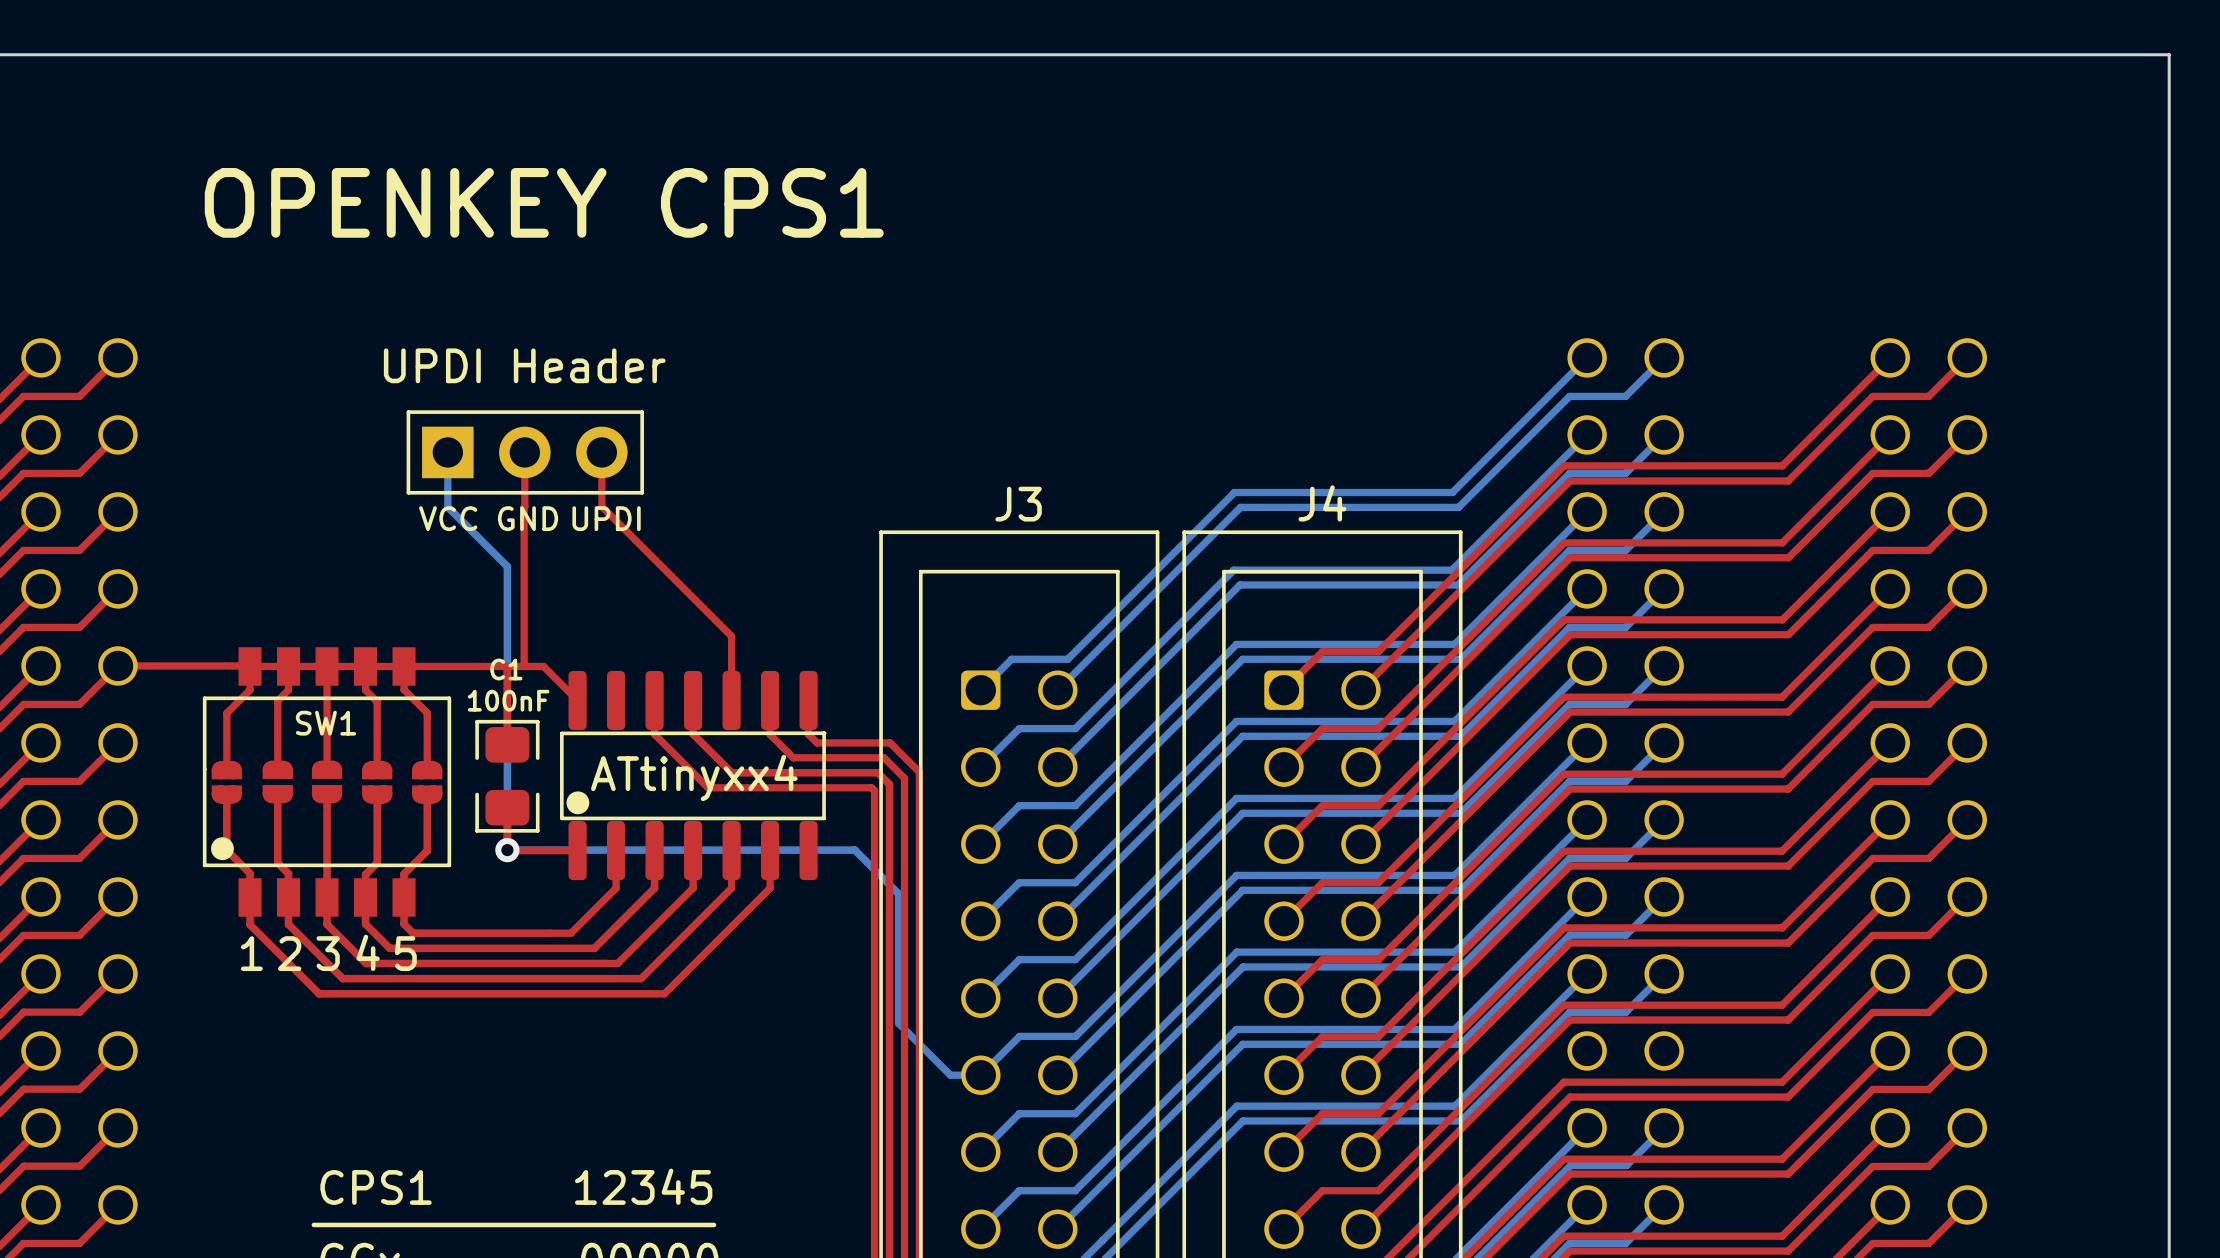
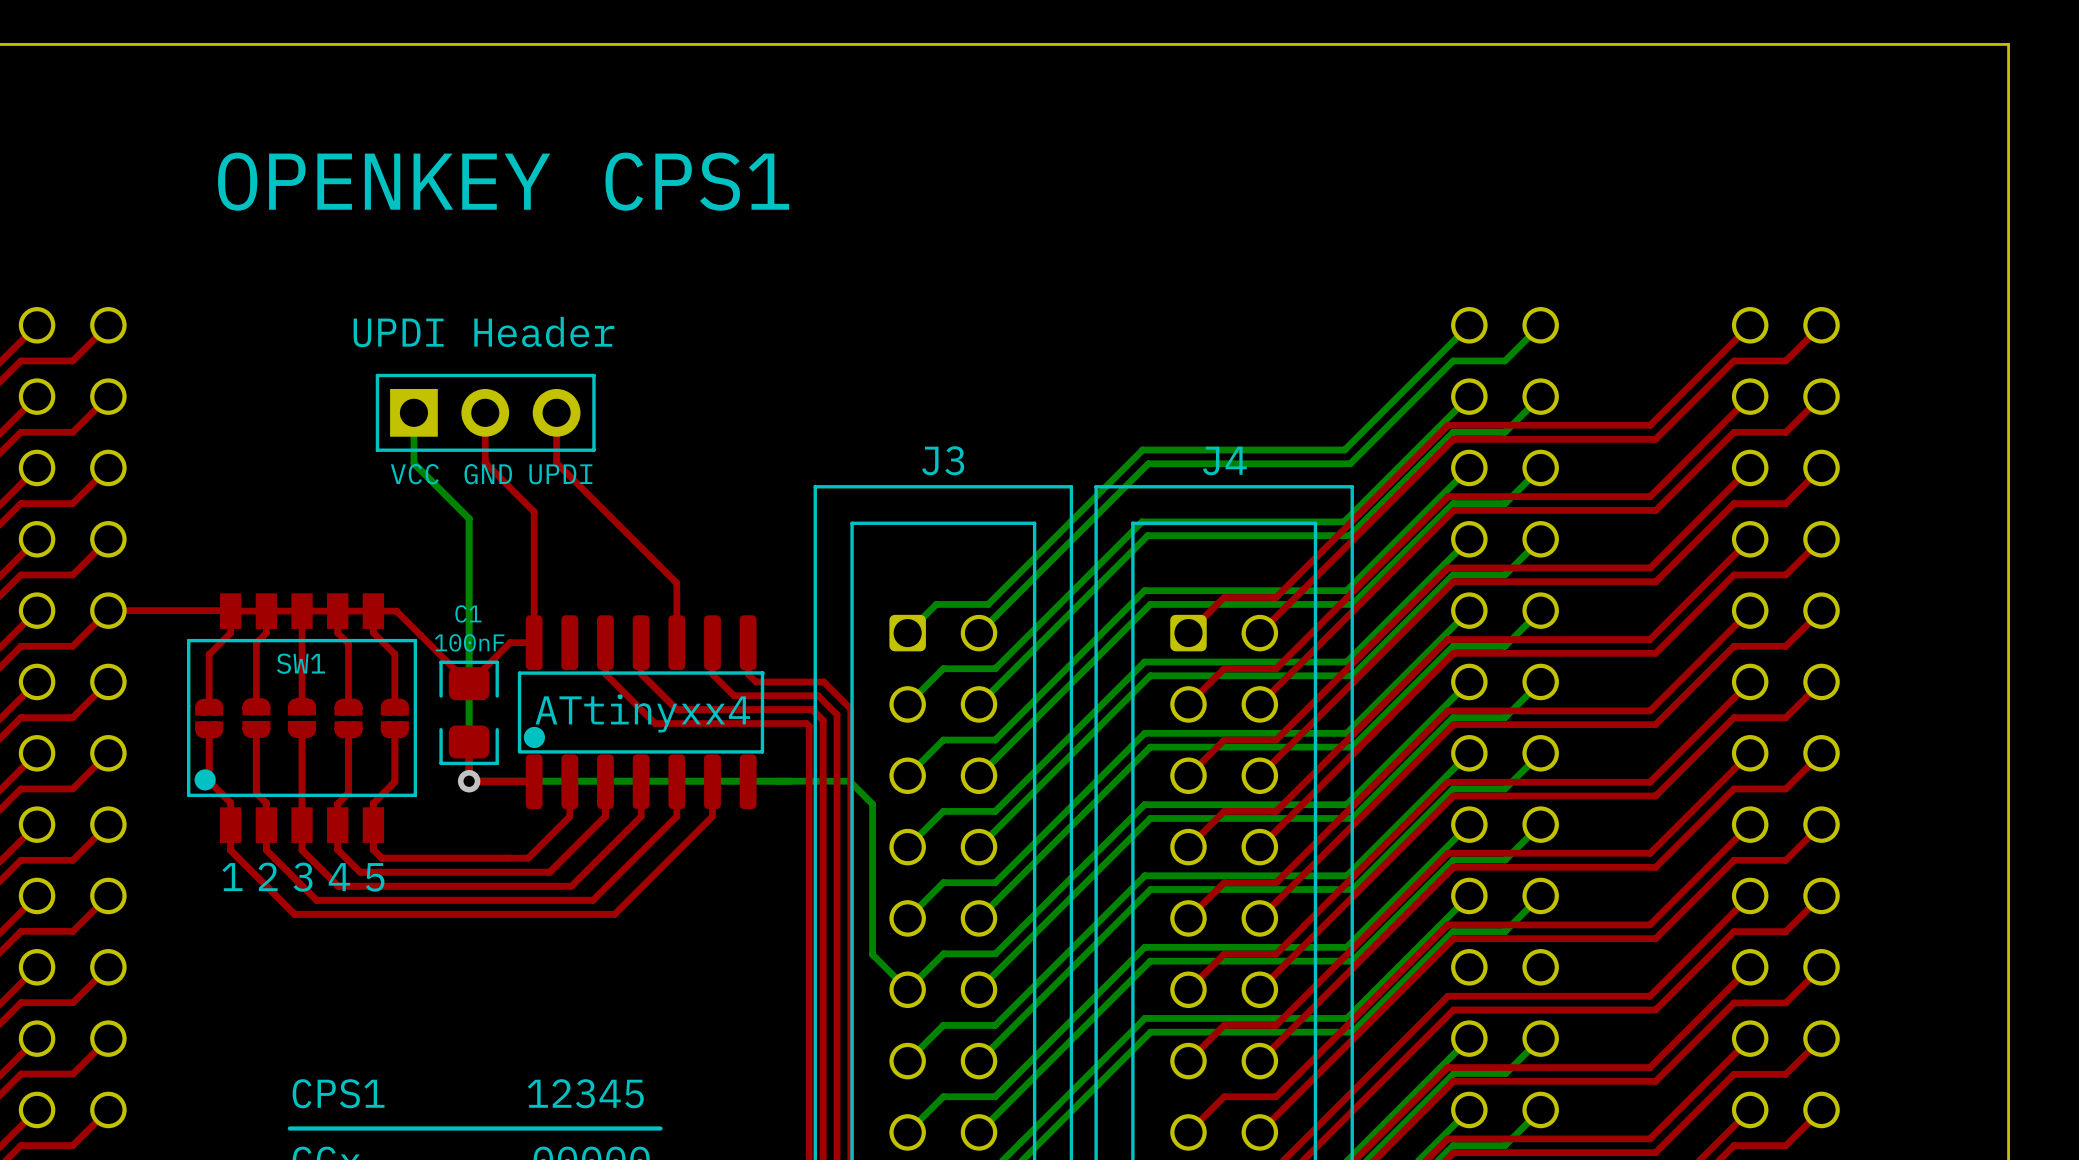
top track: (524, 507) (524, 666) -> (485, 462) (534, 511) (534, 642) (510, 642) (469, 683) (396, 611)
top track: (429, 666) (543, 666) (577, 700) -> none
top track: (505, 666) (507, 668) (507, 744) -> none
bottom track: (854, 850) (898, 893) (898, 1023) (950, 1075) (980, 1075) -> (777, 781) (849, 781) (872, 804) (872, 954) (907, 989)

